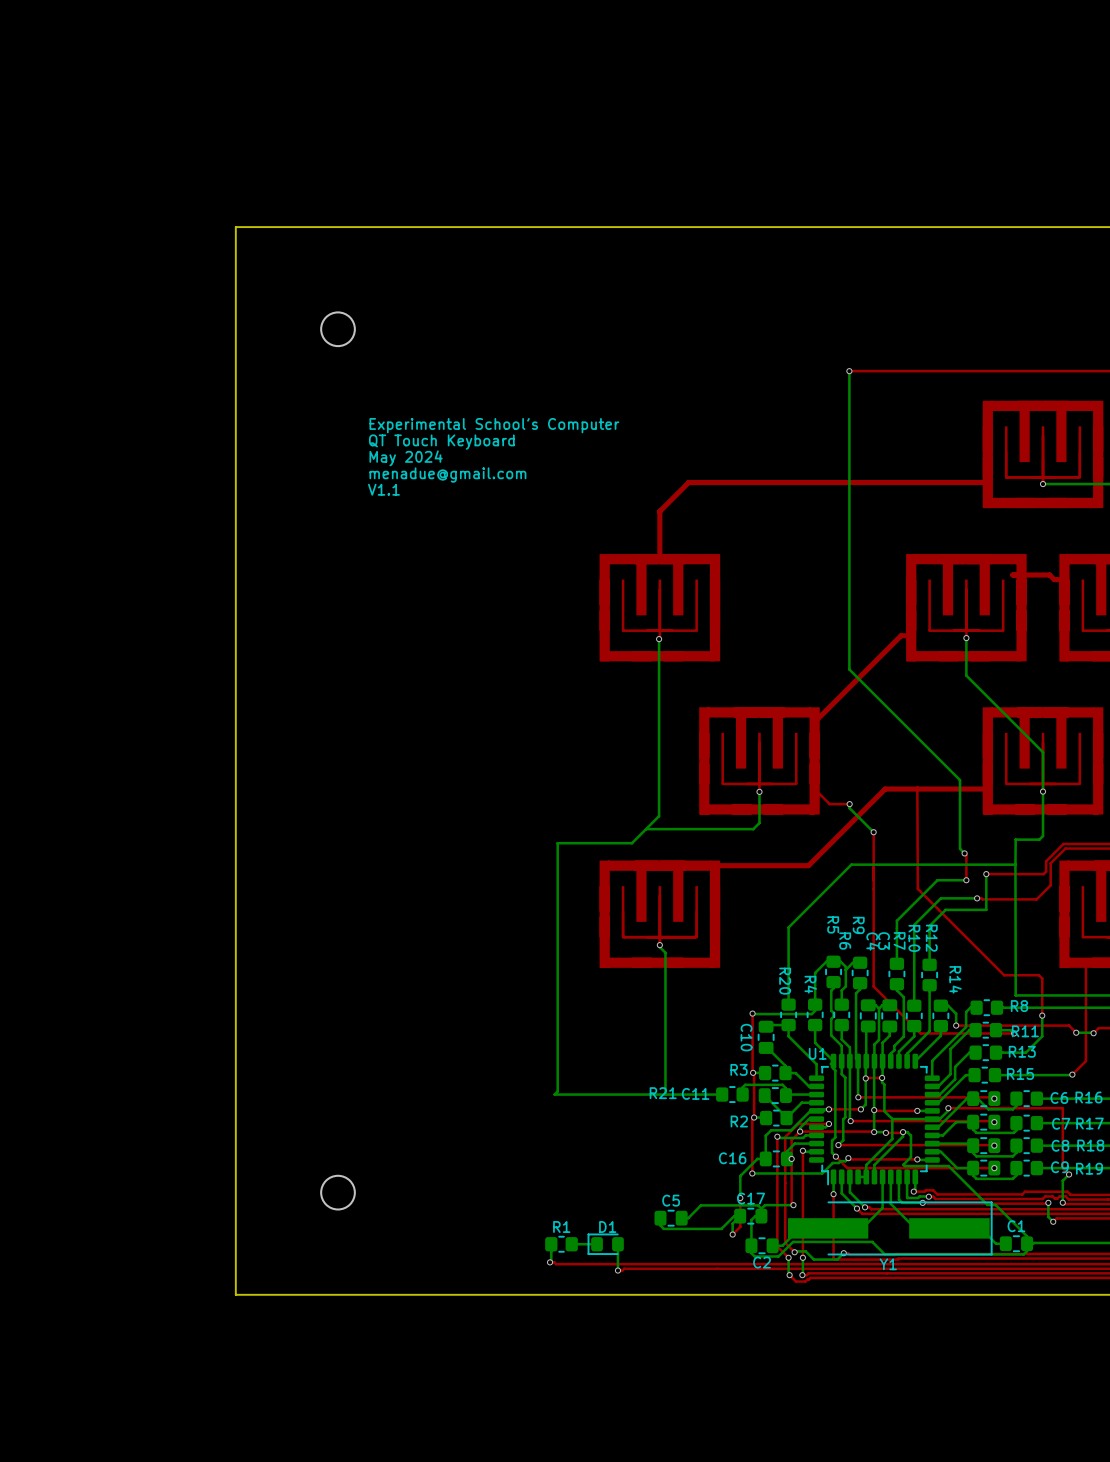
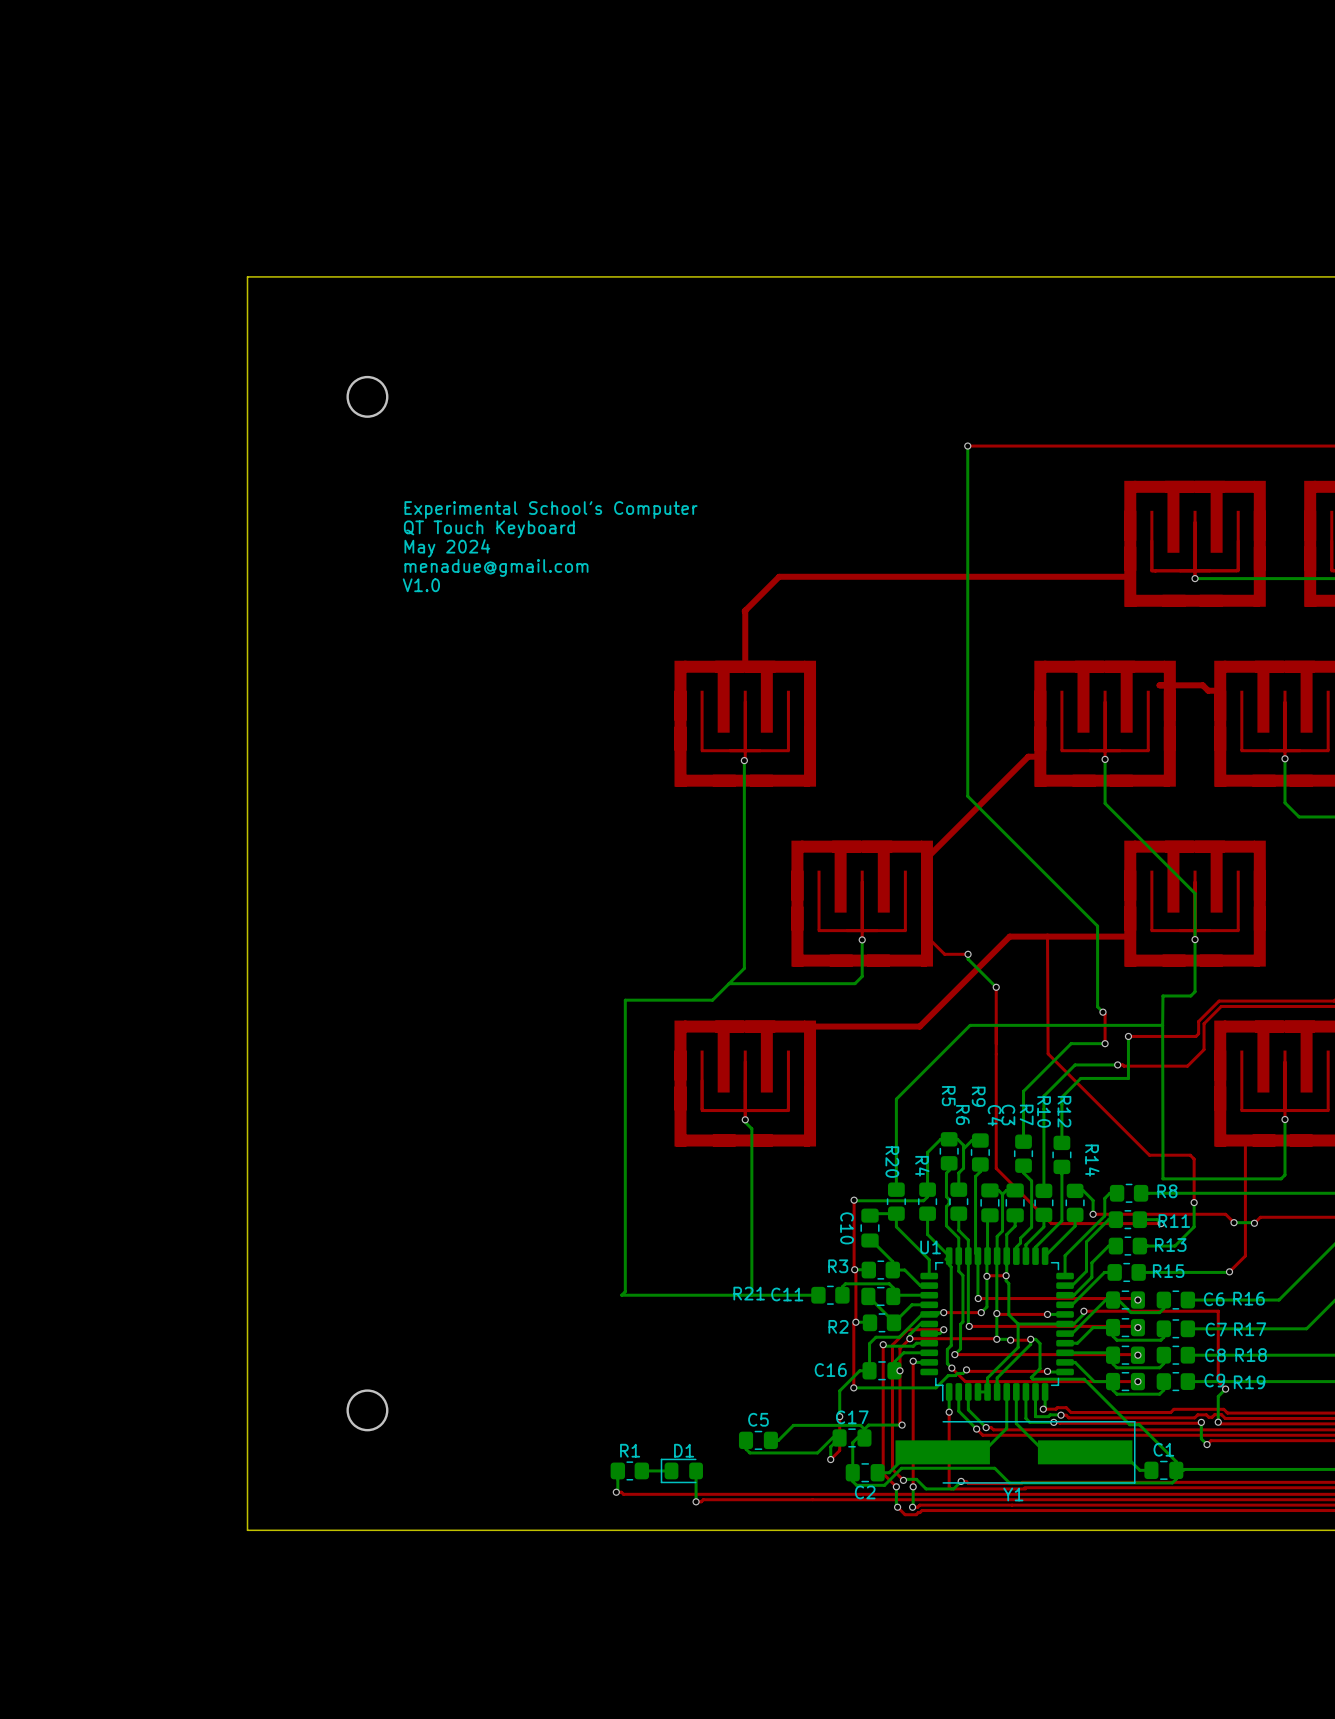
text: V1.1 (383, 489) -> V1.0 (421, 585)

